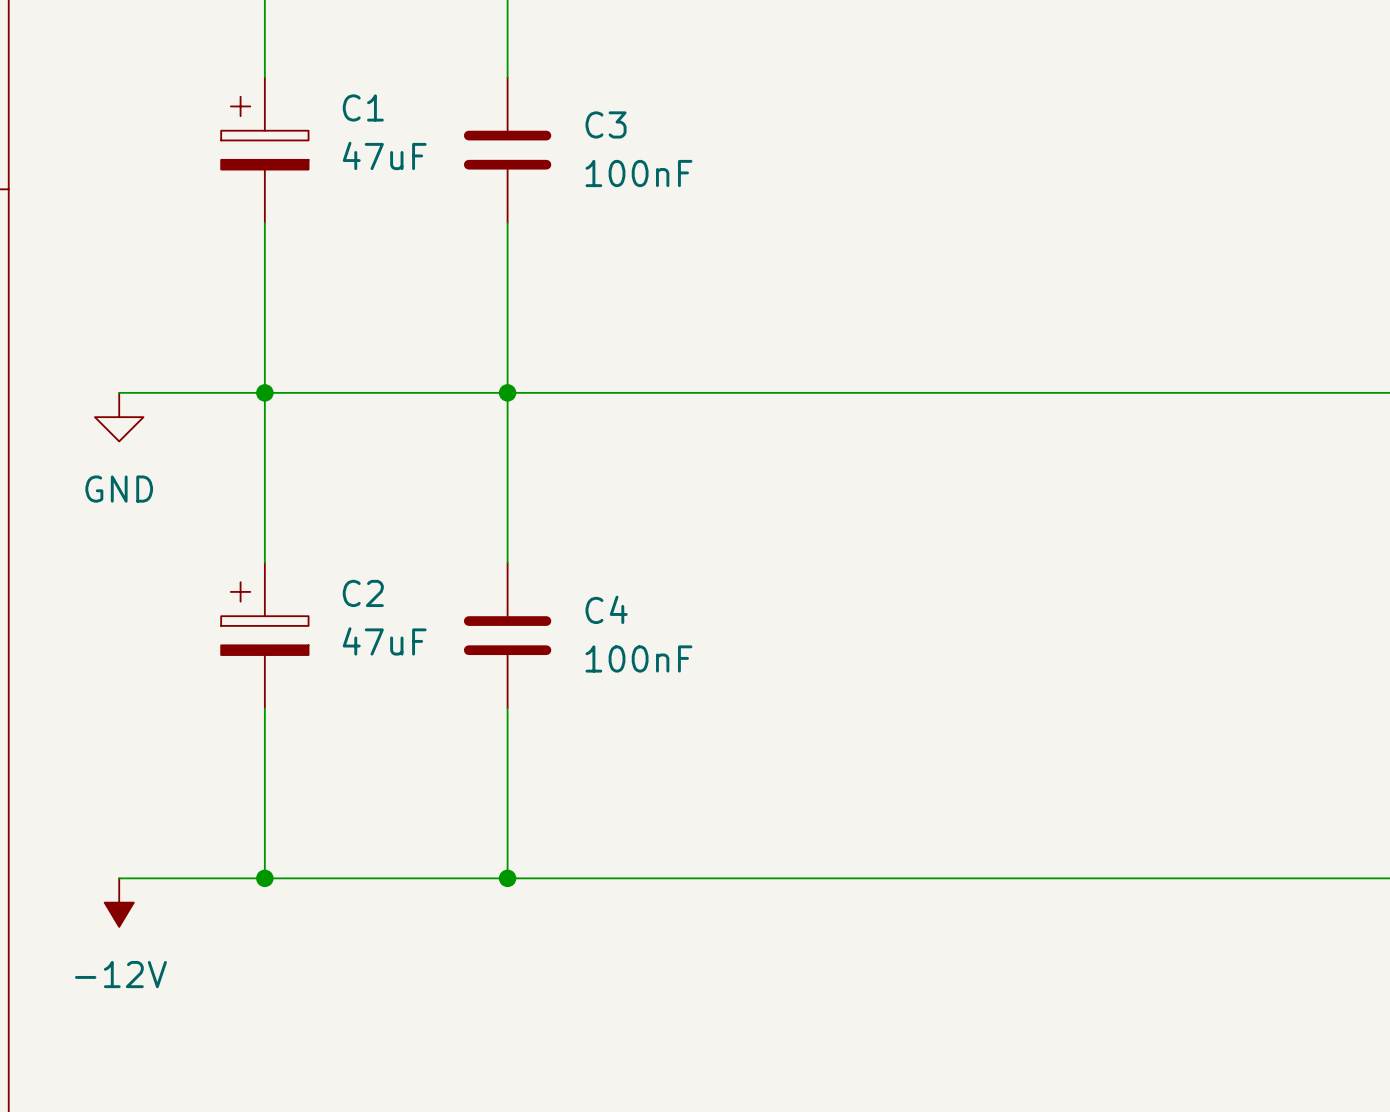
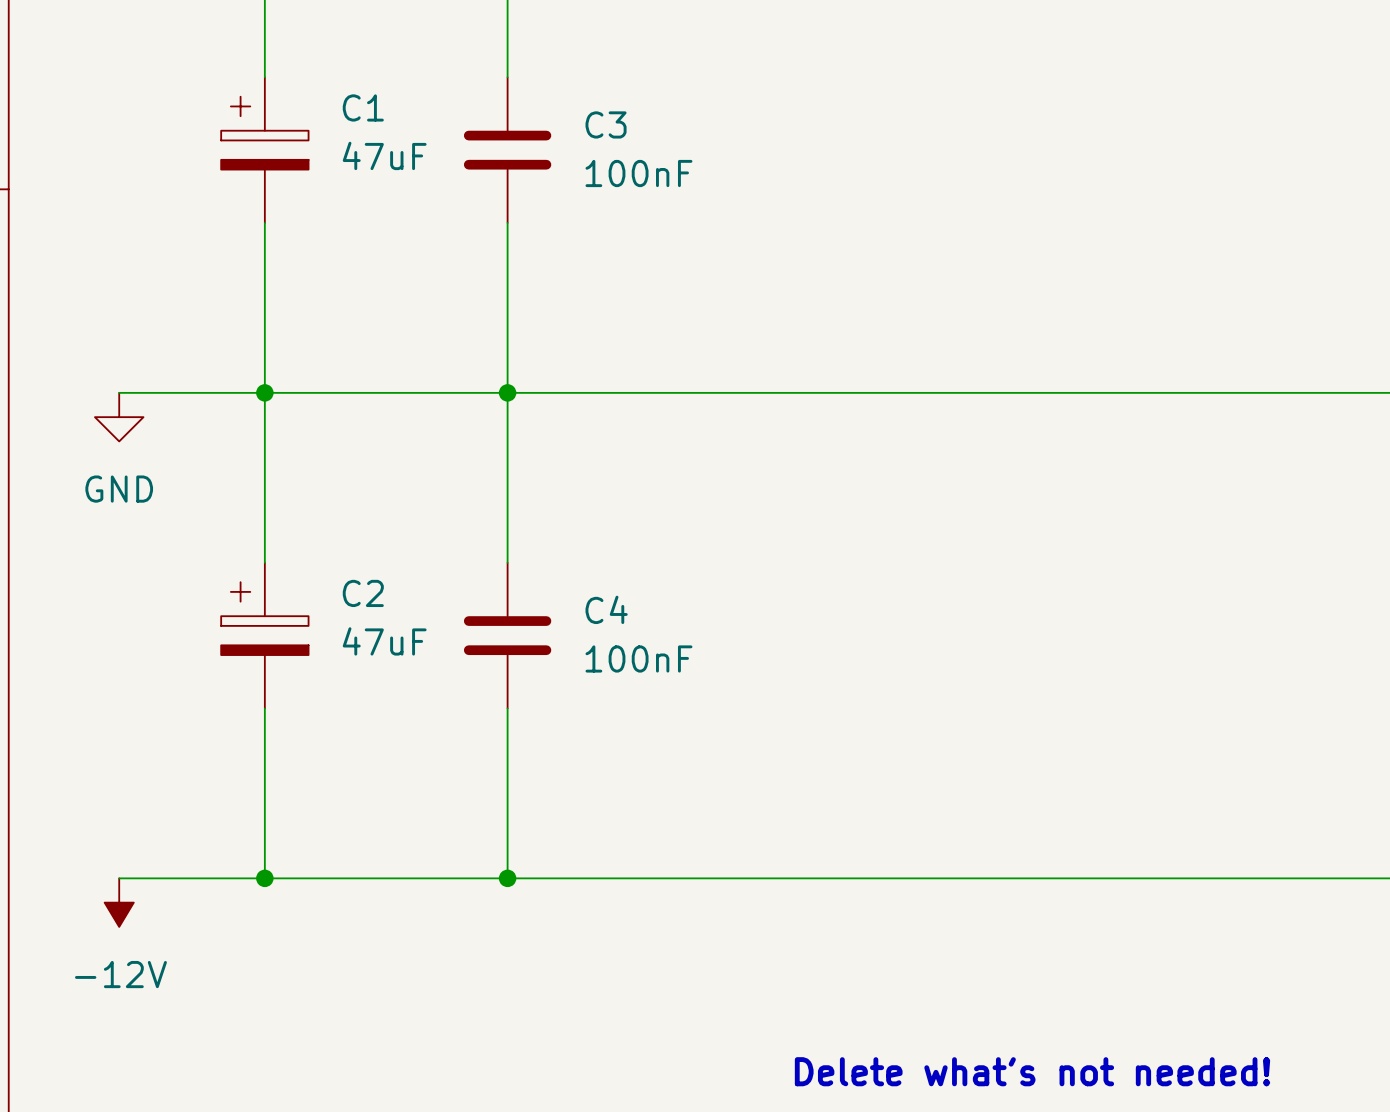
text: none -> Delete what's not needed! (1032, 1071)

